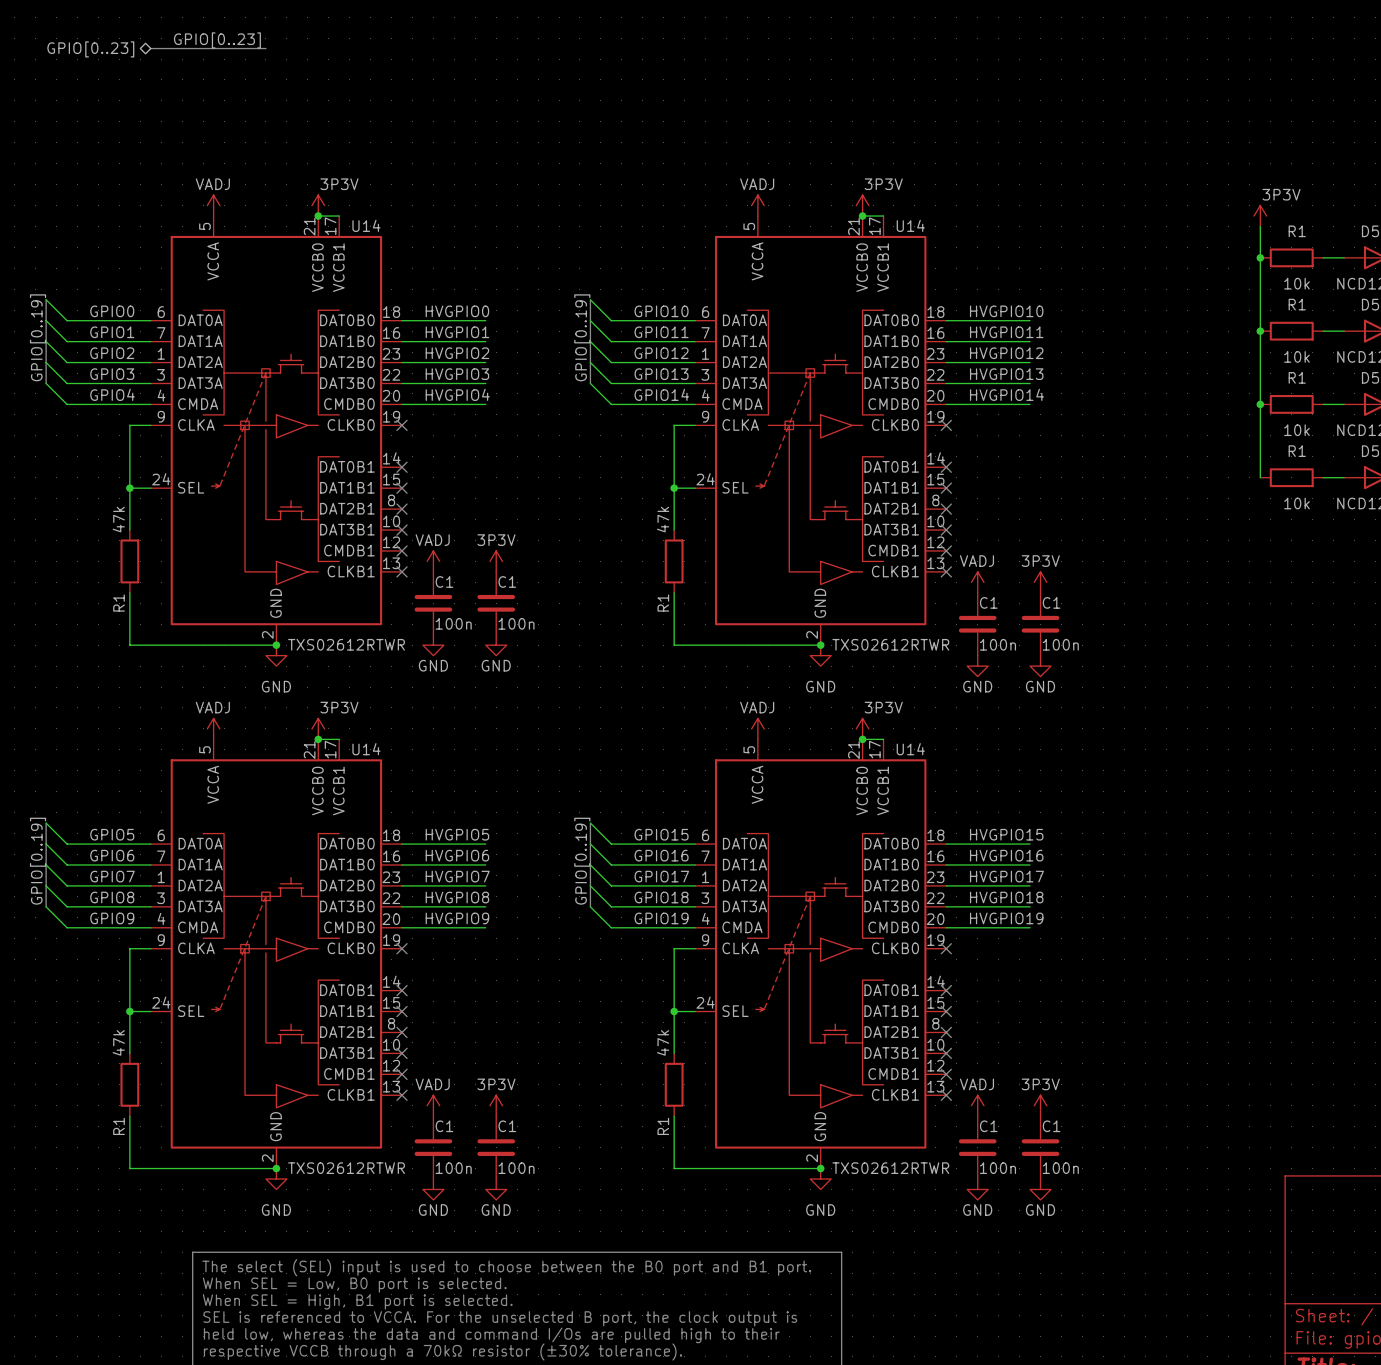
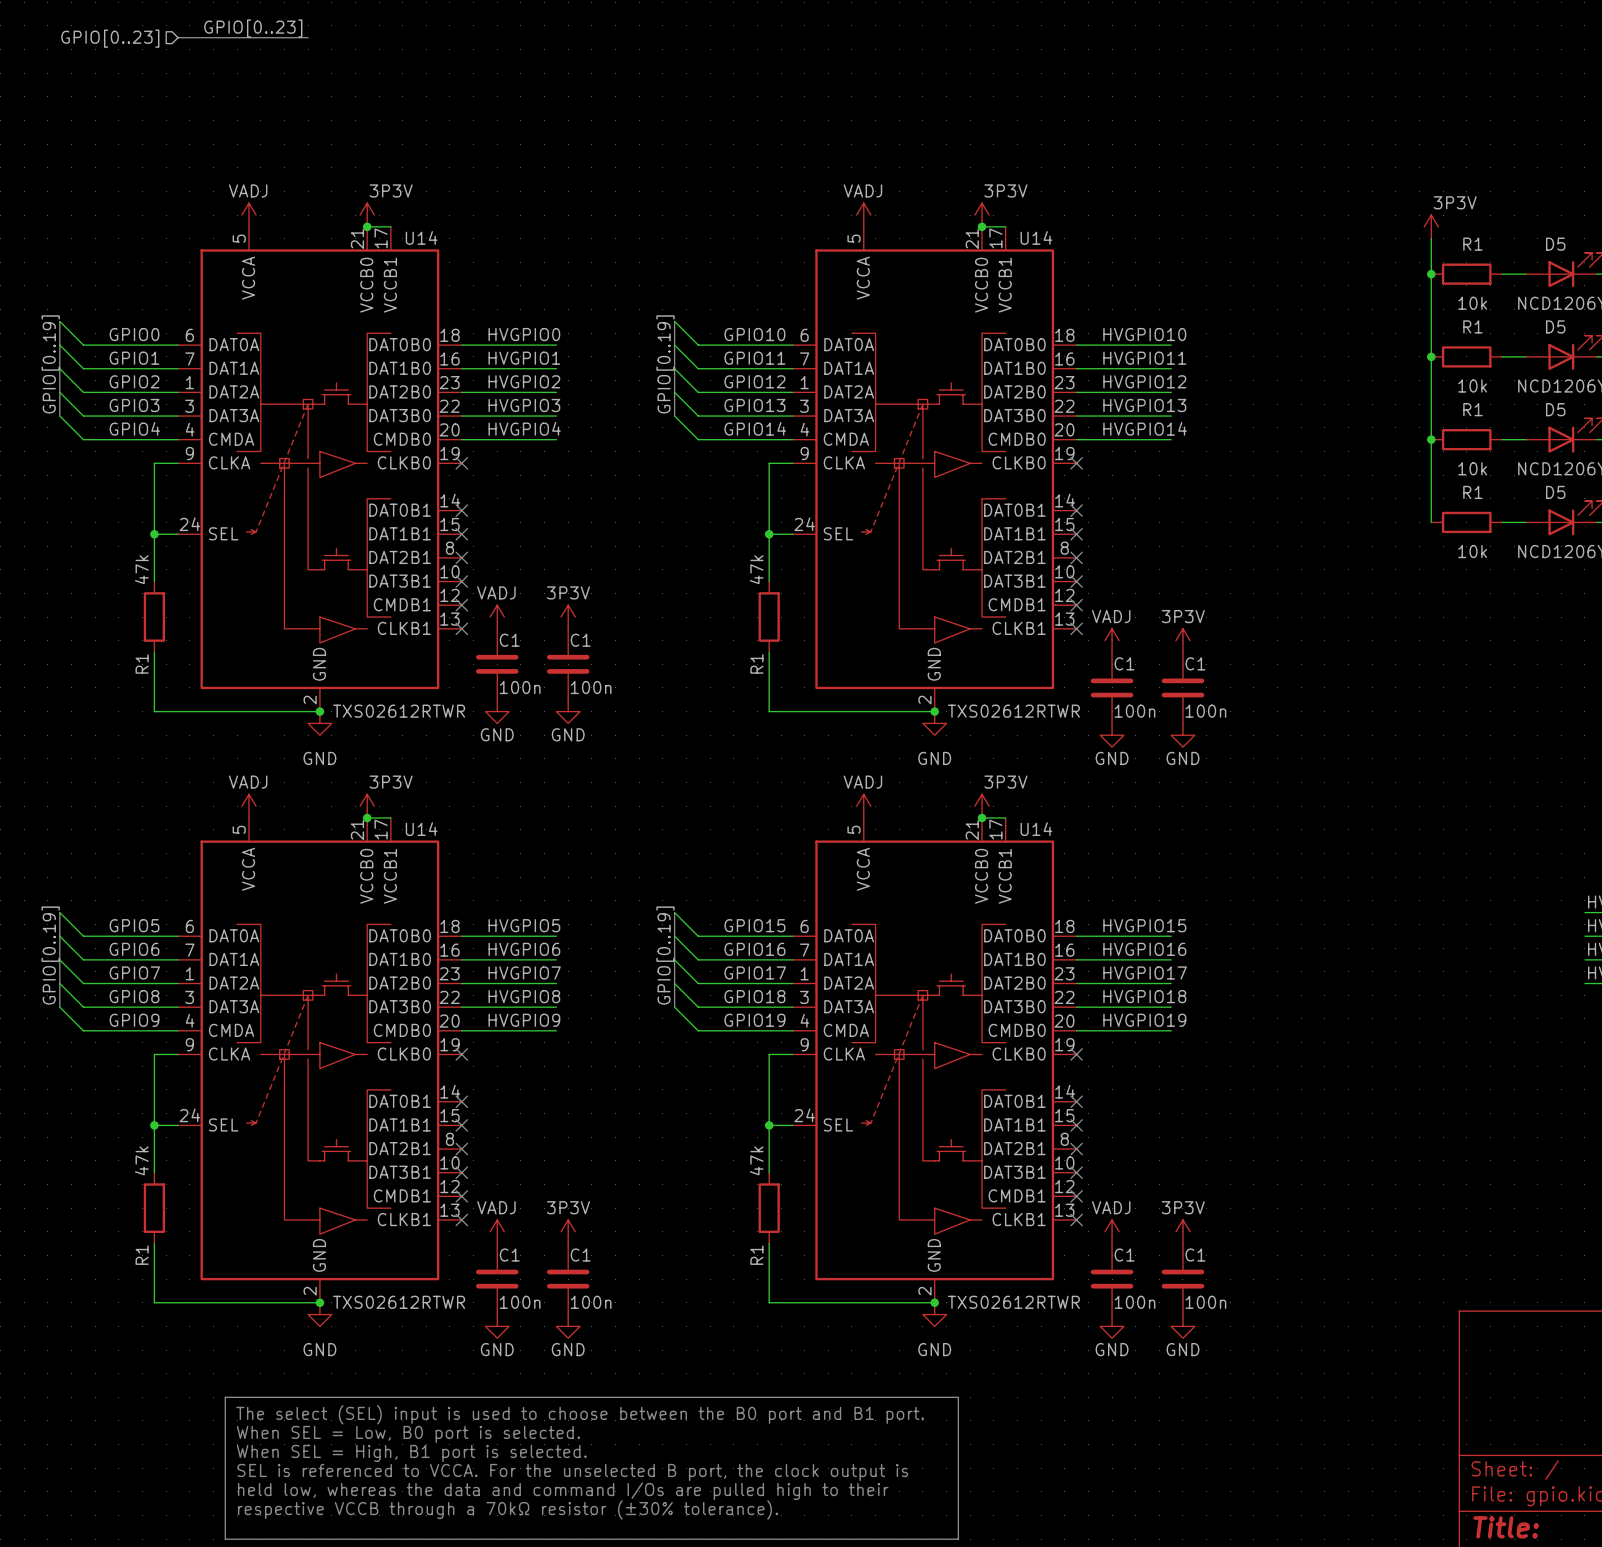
hierarchical label shape: bidirectional (90, 49) -> input (110, 38)

